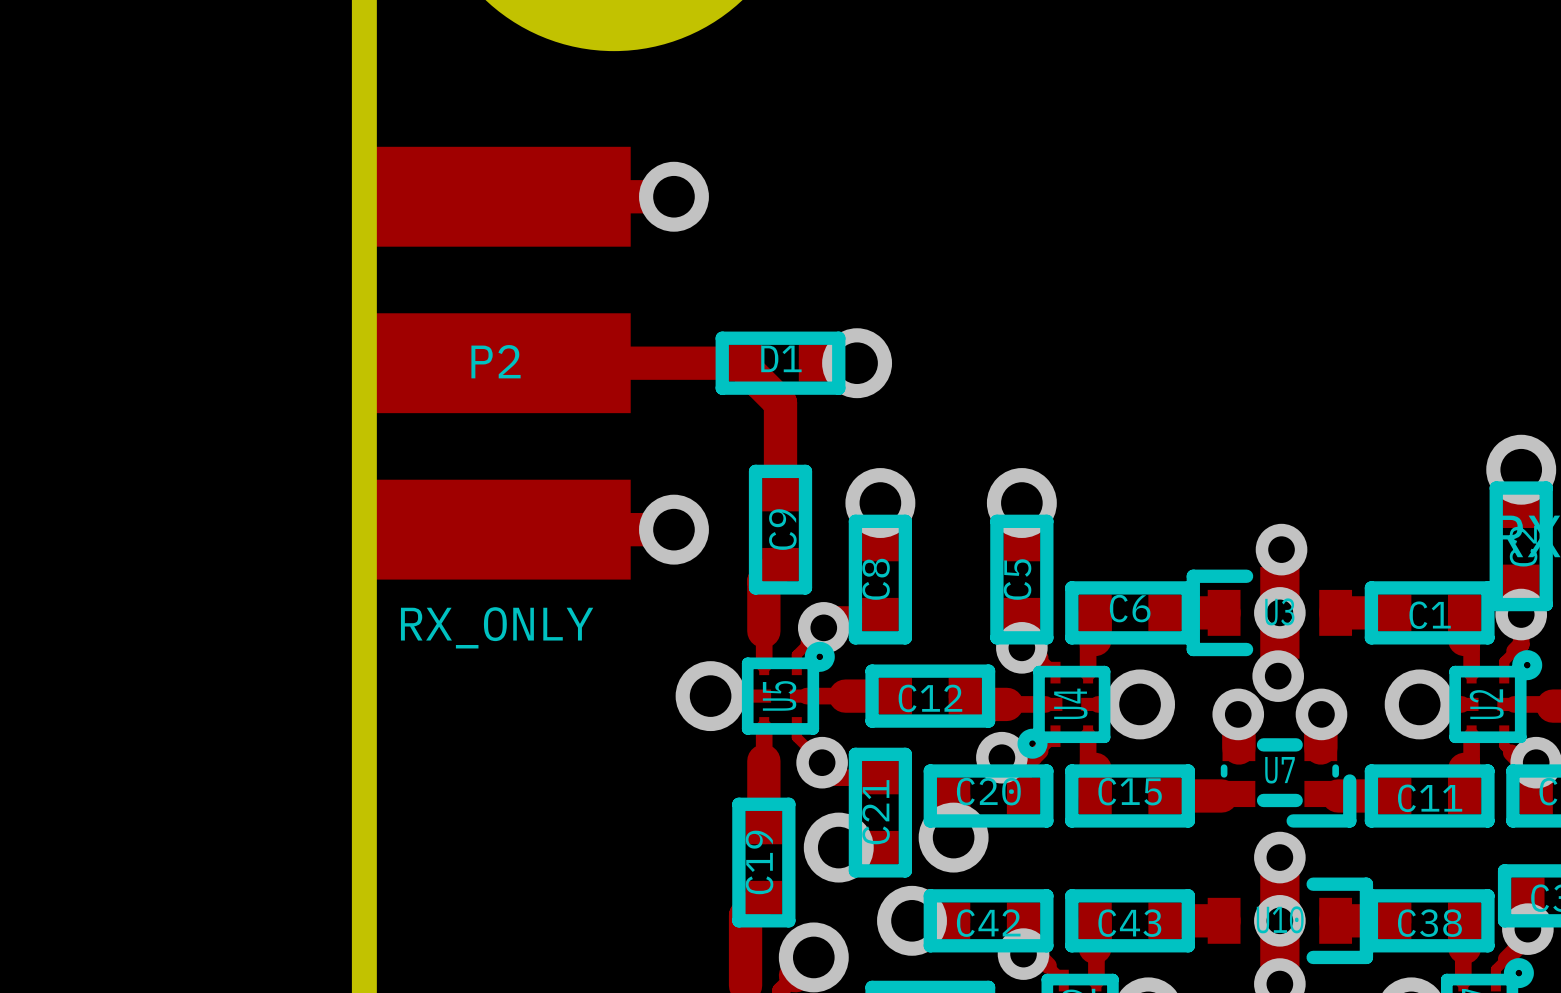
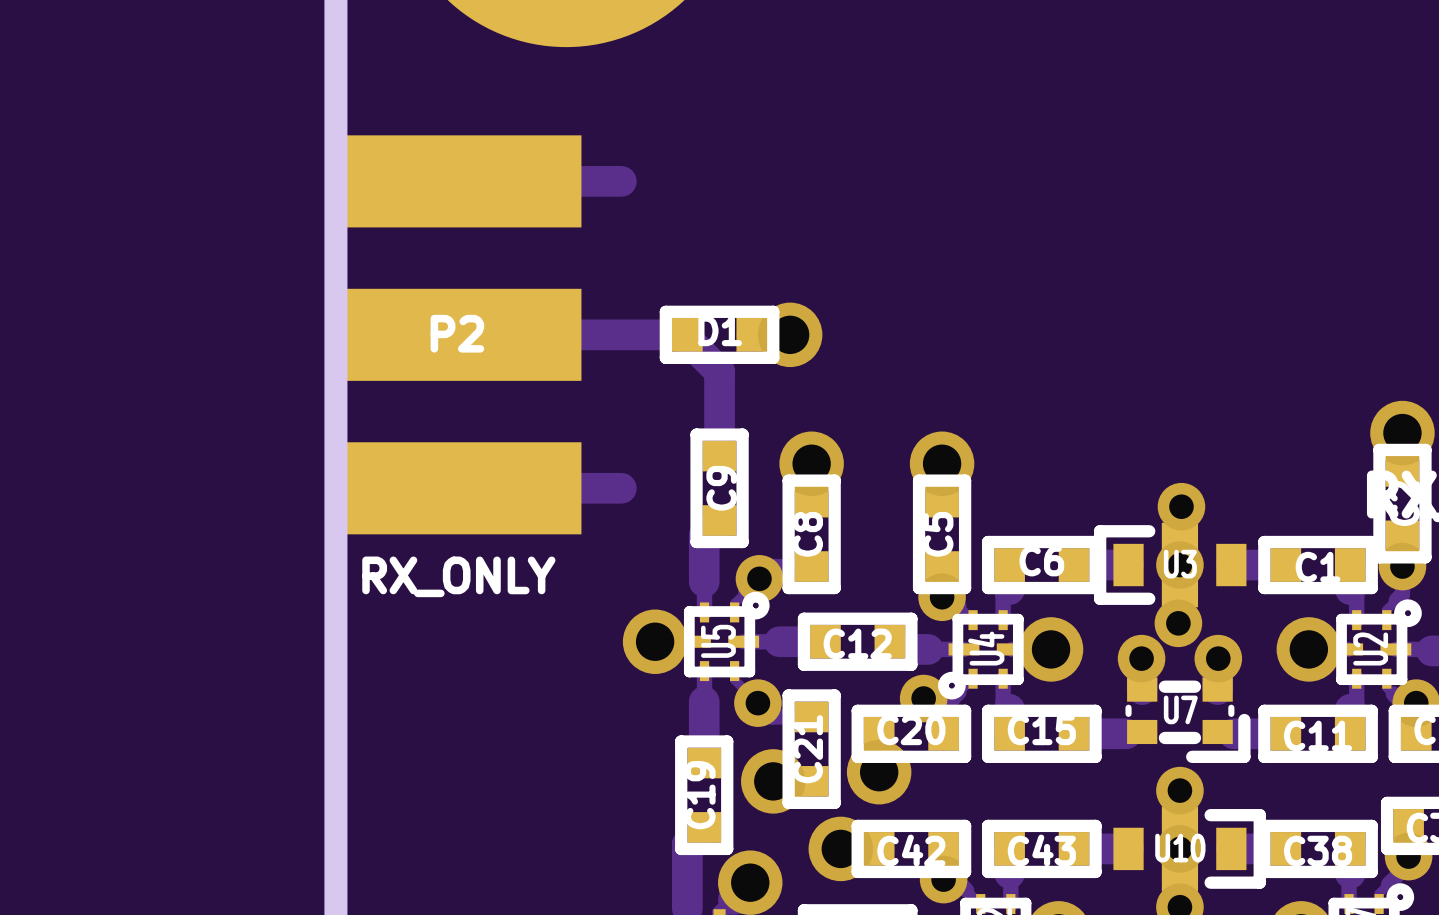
via: (673, 196) -> none
via: (673, 529) -> none

